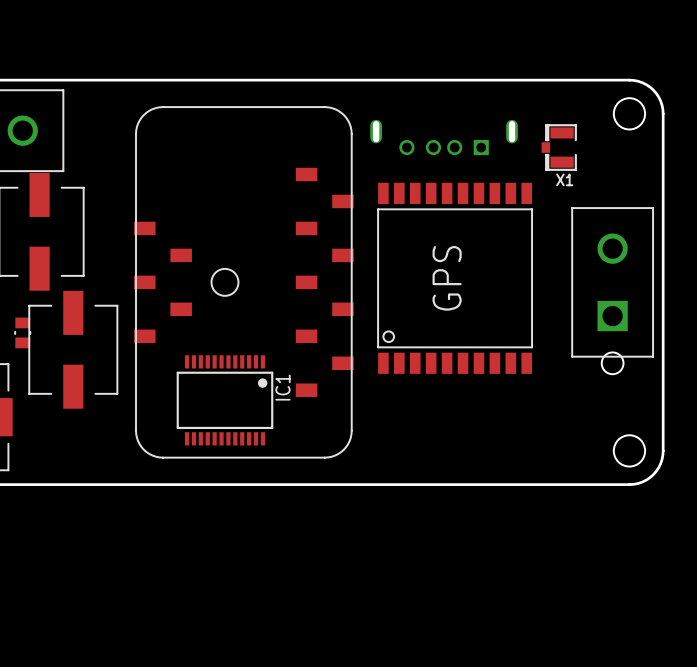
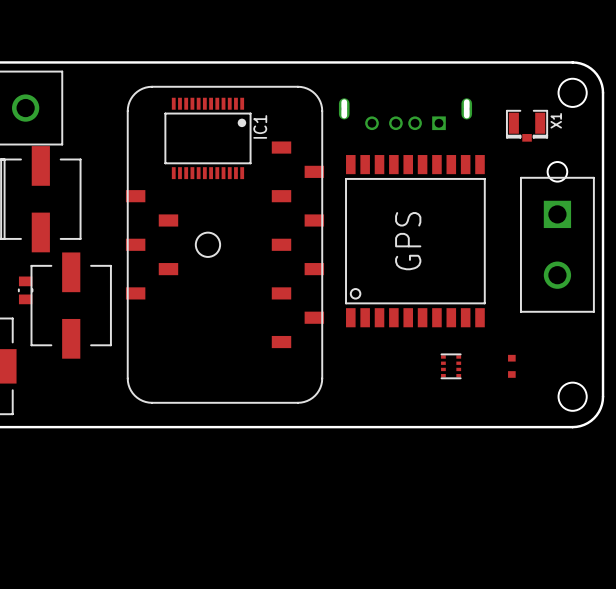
X1 rotation: 0° (559, 147) -> 90° counterclockwise (527, 125)
part rotation: 0° (612, 290) -> 180° (557, 237)
IC1 position: (224, 400) -> (207, 138)
part: none -> (451, 366)
part: none -> (511, 366)

